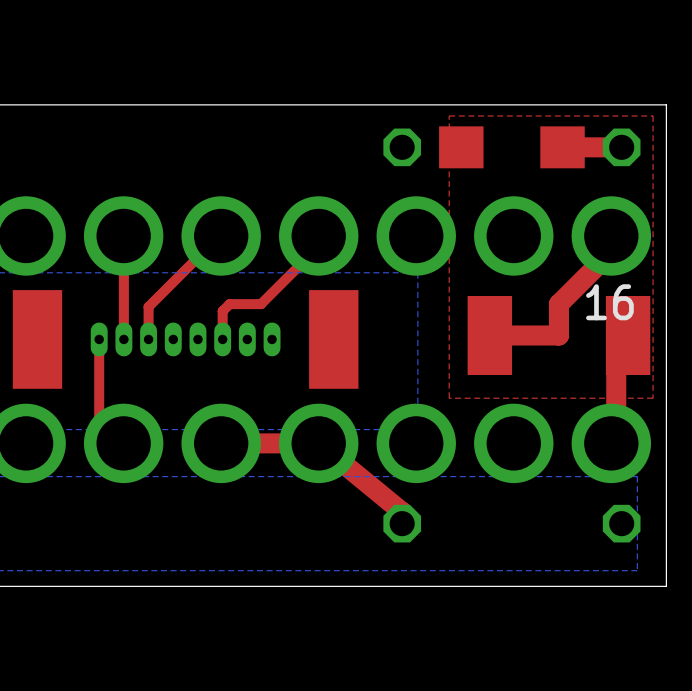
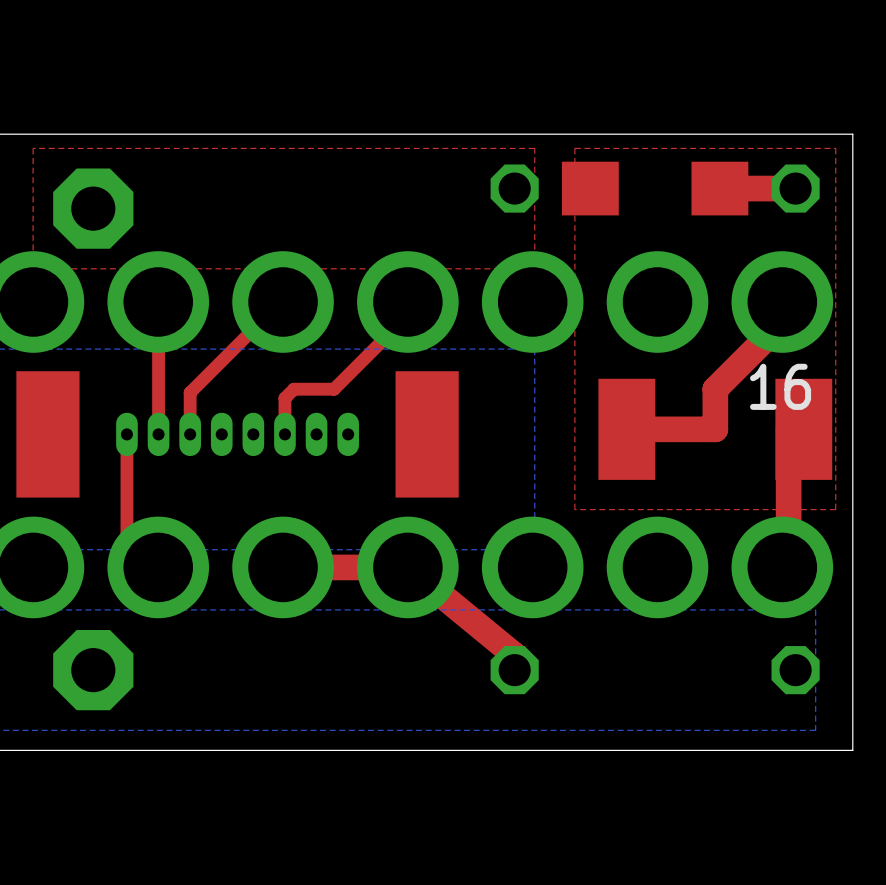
top zone outline: none -> (534, 148) (33, 148) (33, 268) (534, 268) (534, 148)
part: none -> (93, 208)
part: none -> (93, 670)

